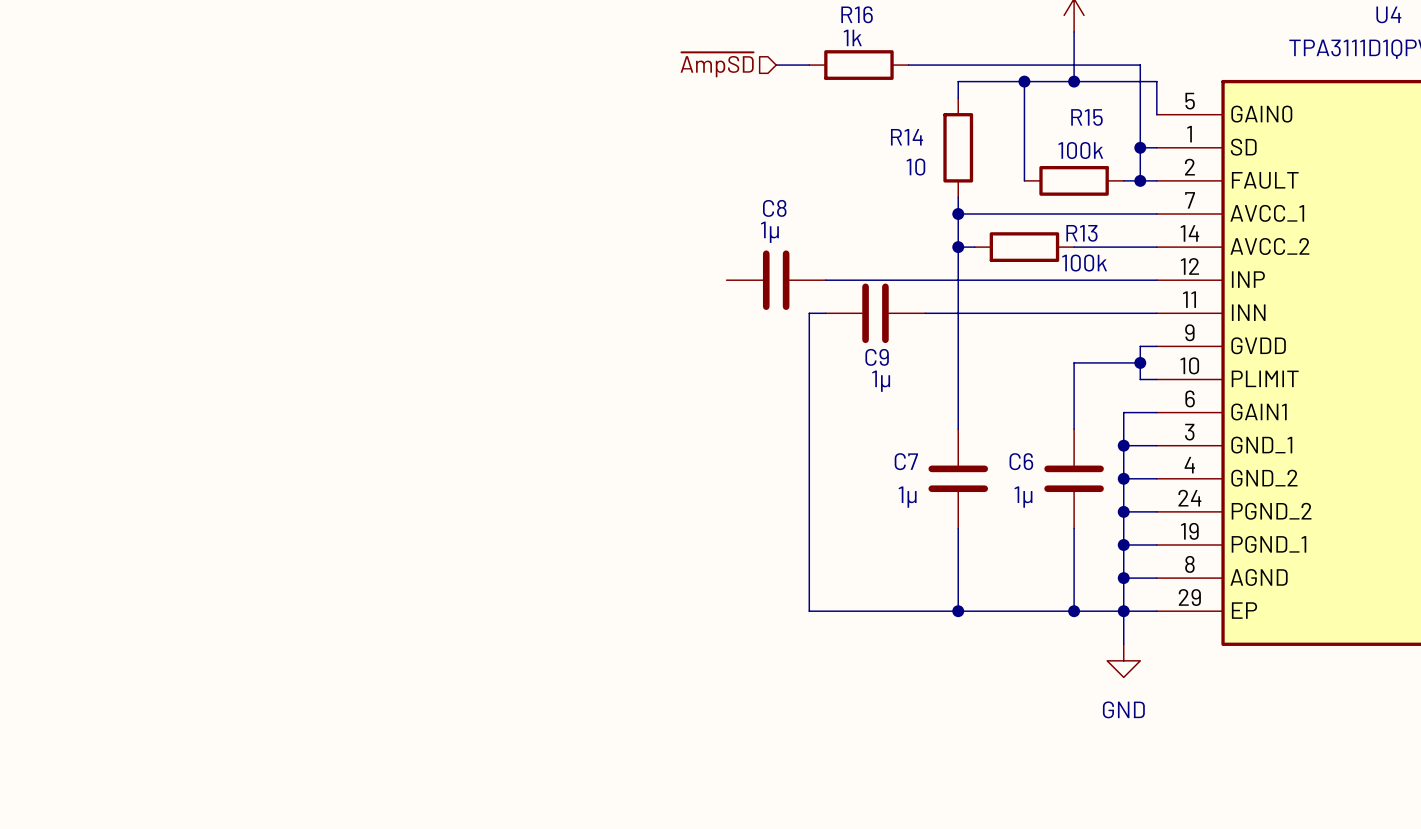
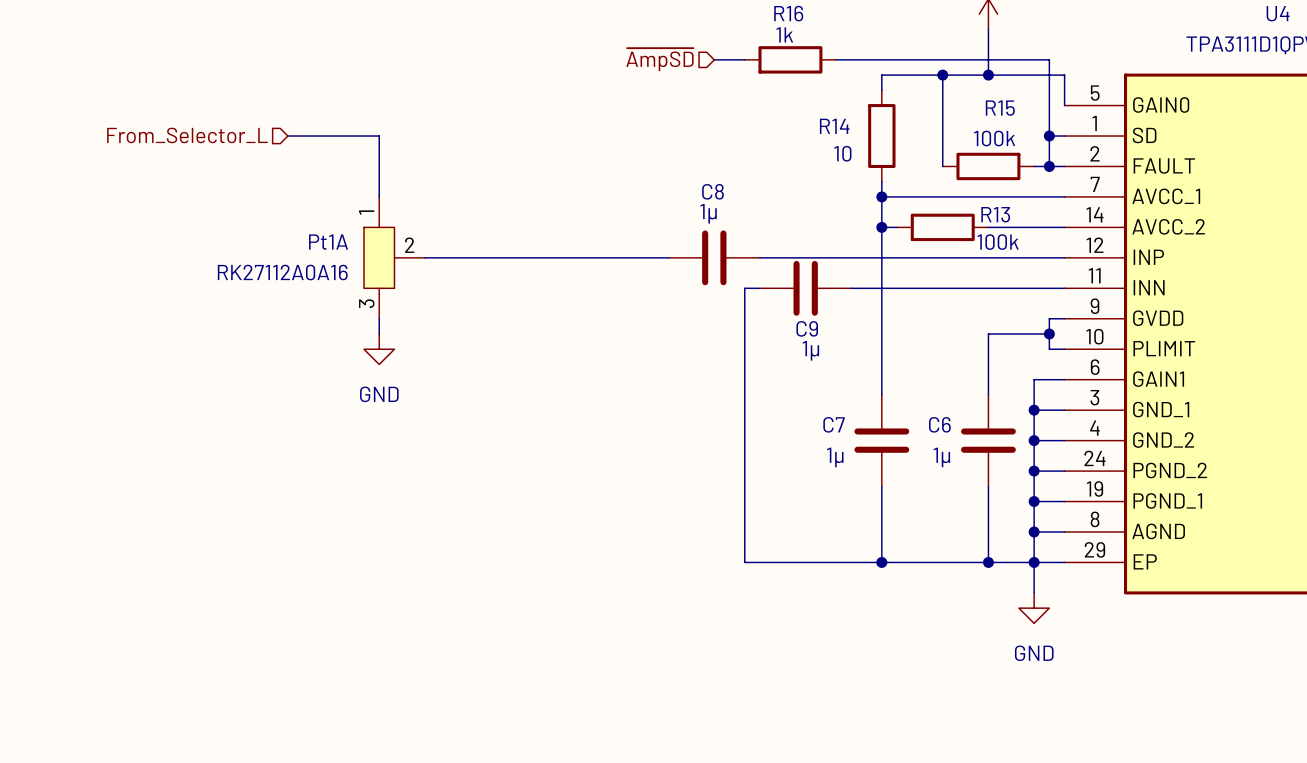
hierarchical label: none -> From_Selector_L (187, 135)
wire: none -> (287, 136) (379, 136) (379, 196)
Pt1A: none -> RK27112A0A16 (394, 257)
wire: none -> (424, 257) (668, 257)
wire: none -> (379, 318) (379, 334)
power symbol: none -> GND (379, 349)

